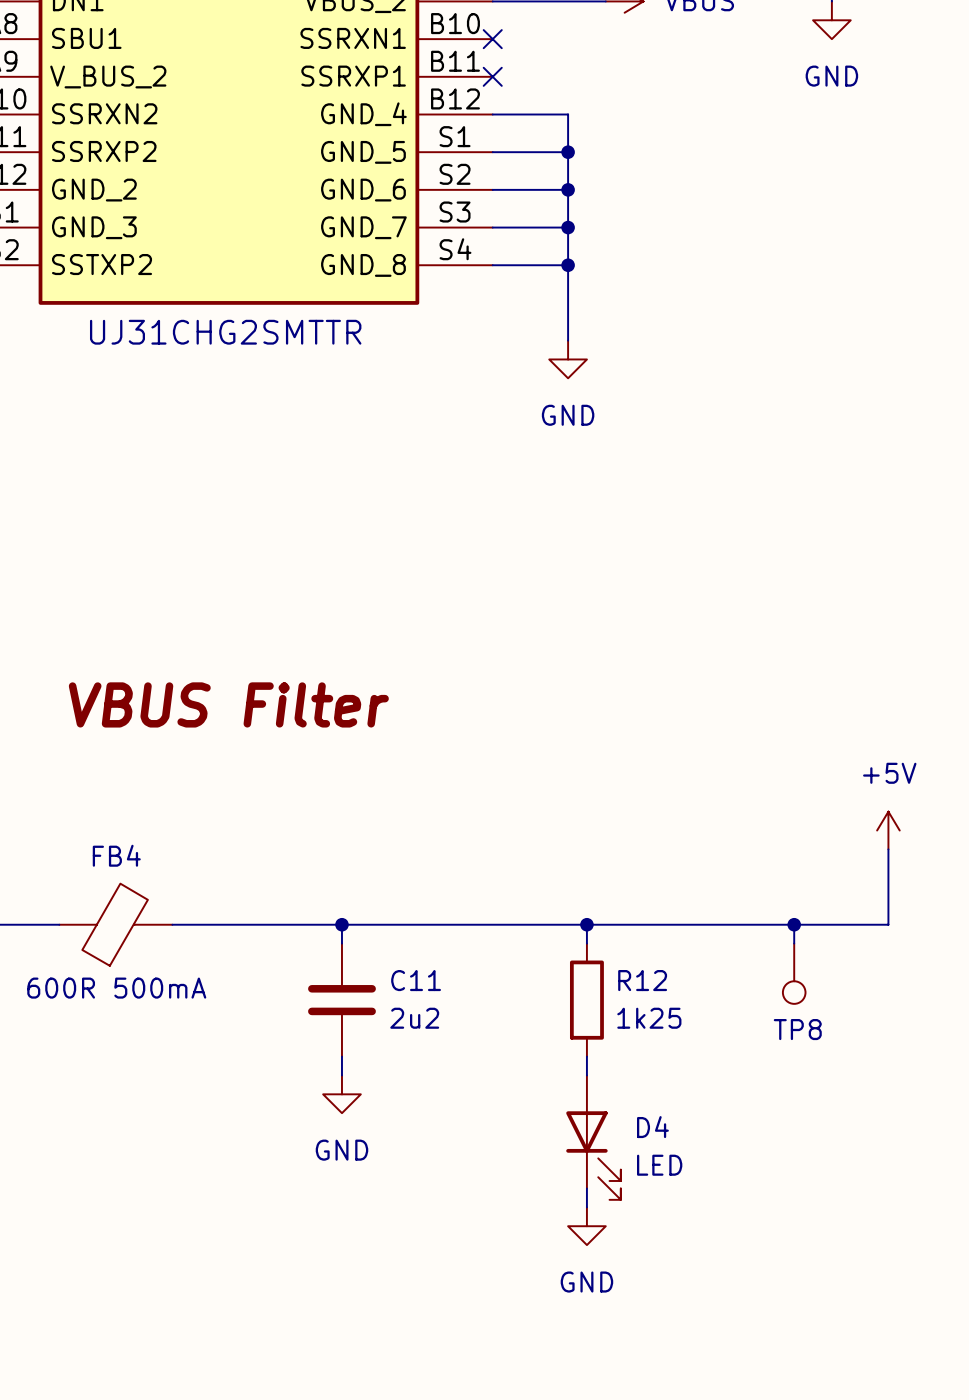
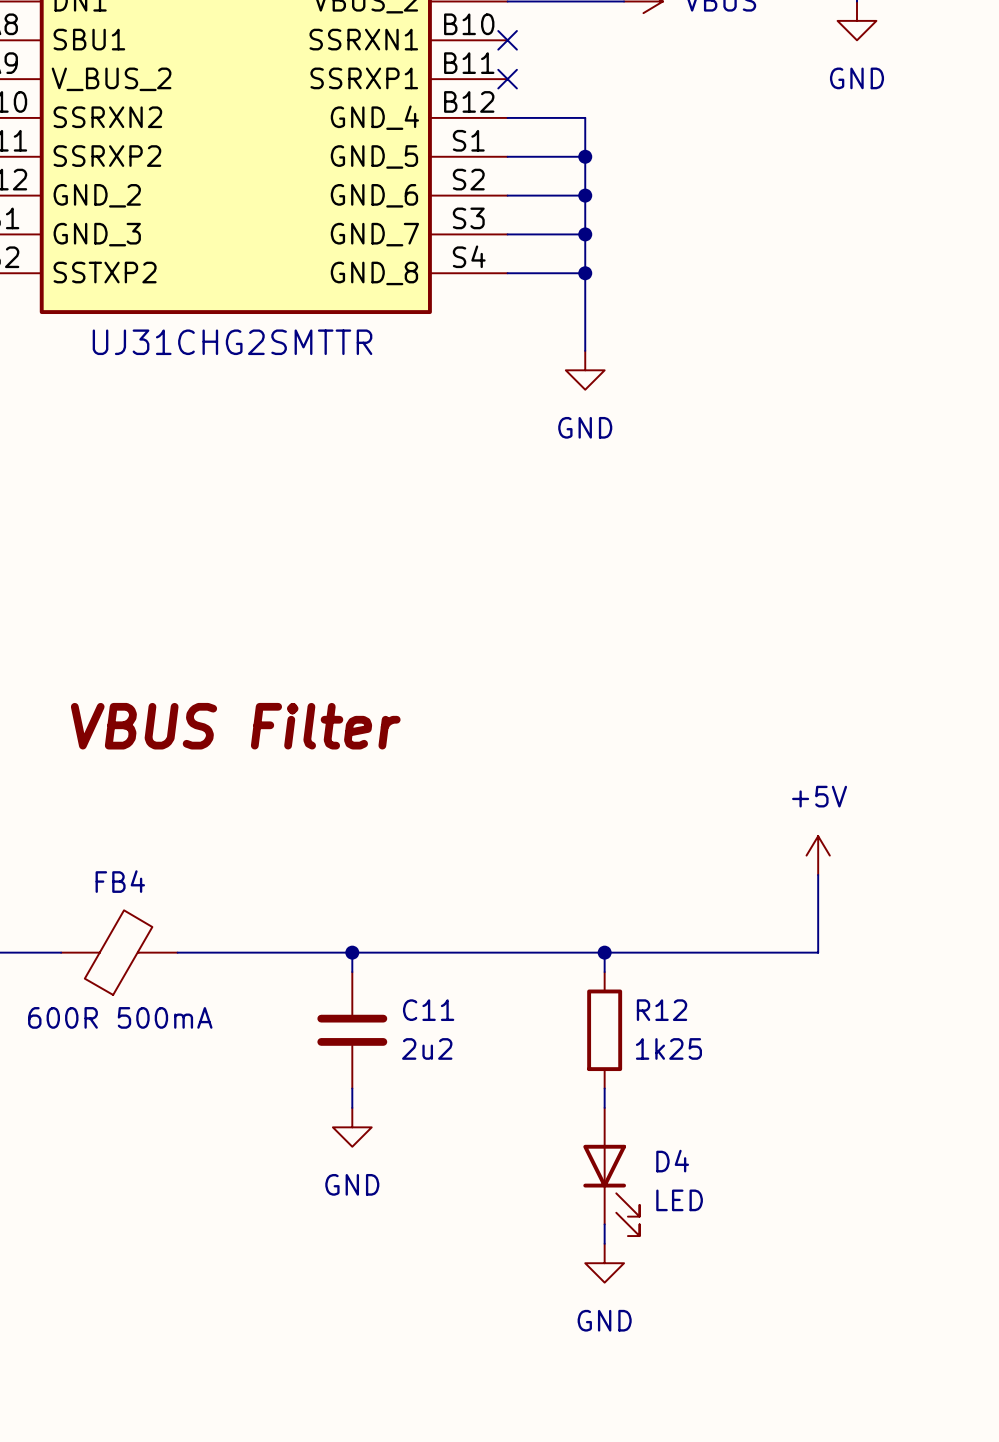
power symbol position: +5V (888, 830) -> +5V (818, 855)
wire: none -> (818, 874) (818, 952)
wire: (888, 849) (888, 924) (794, 924) (794, 943) -> none
junction: (794, 924) -> none
TP8: (794, 973) -> none

